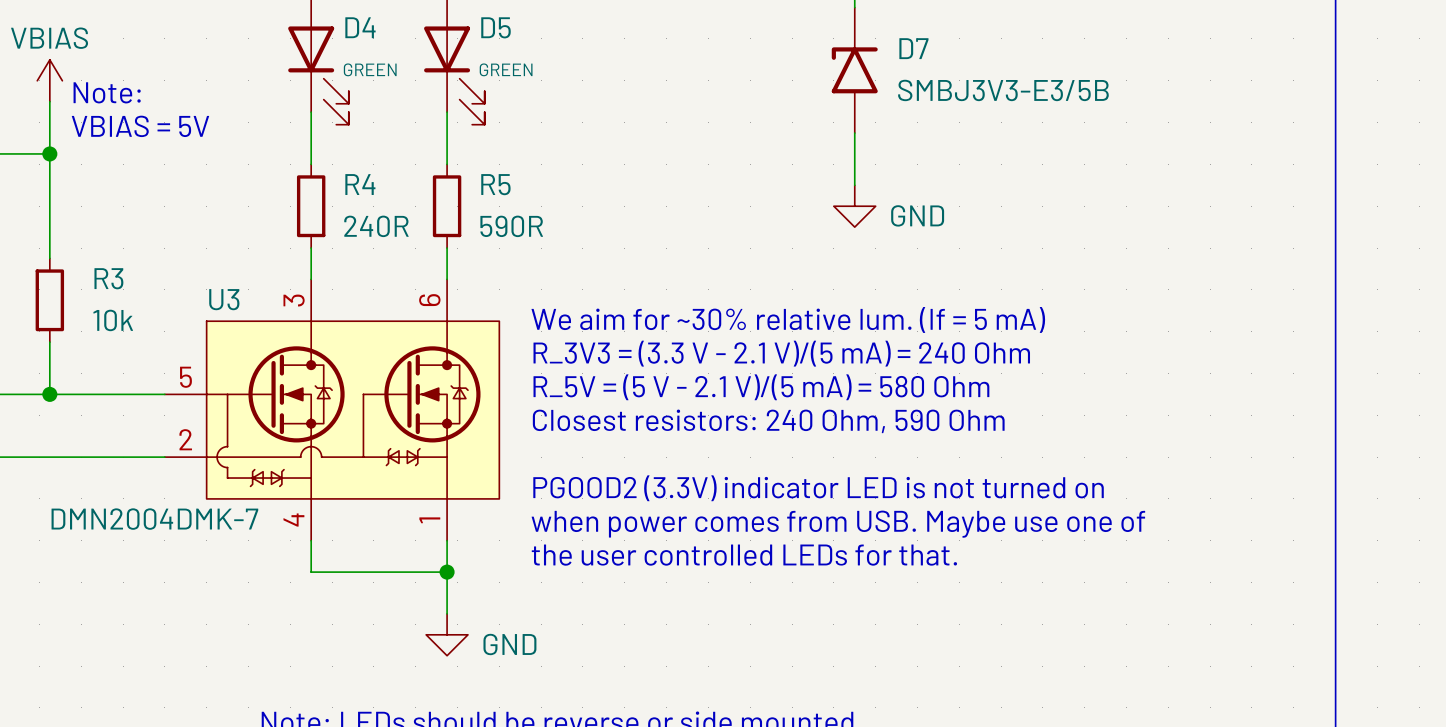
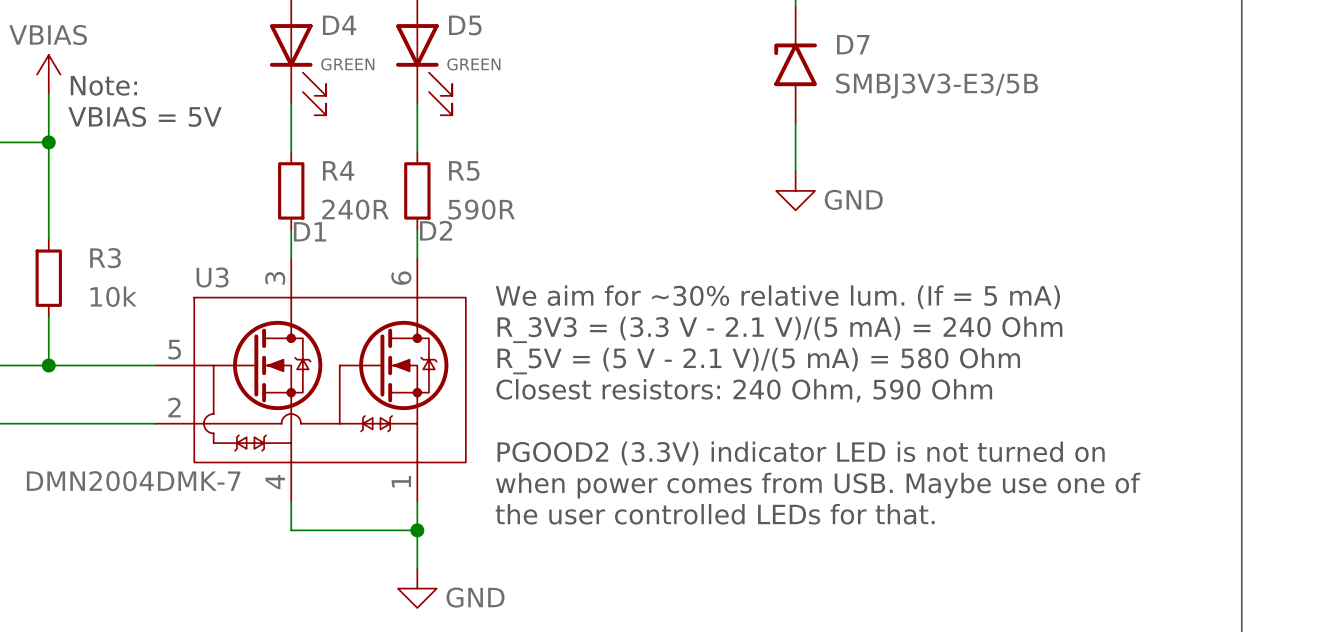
label: none -> D2 (436, 230)
label: none -> D1 (310, 231)

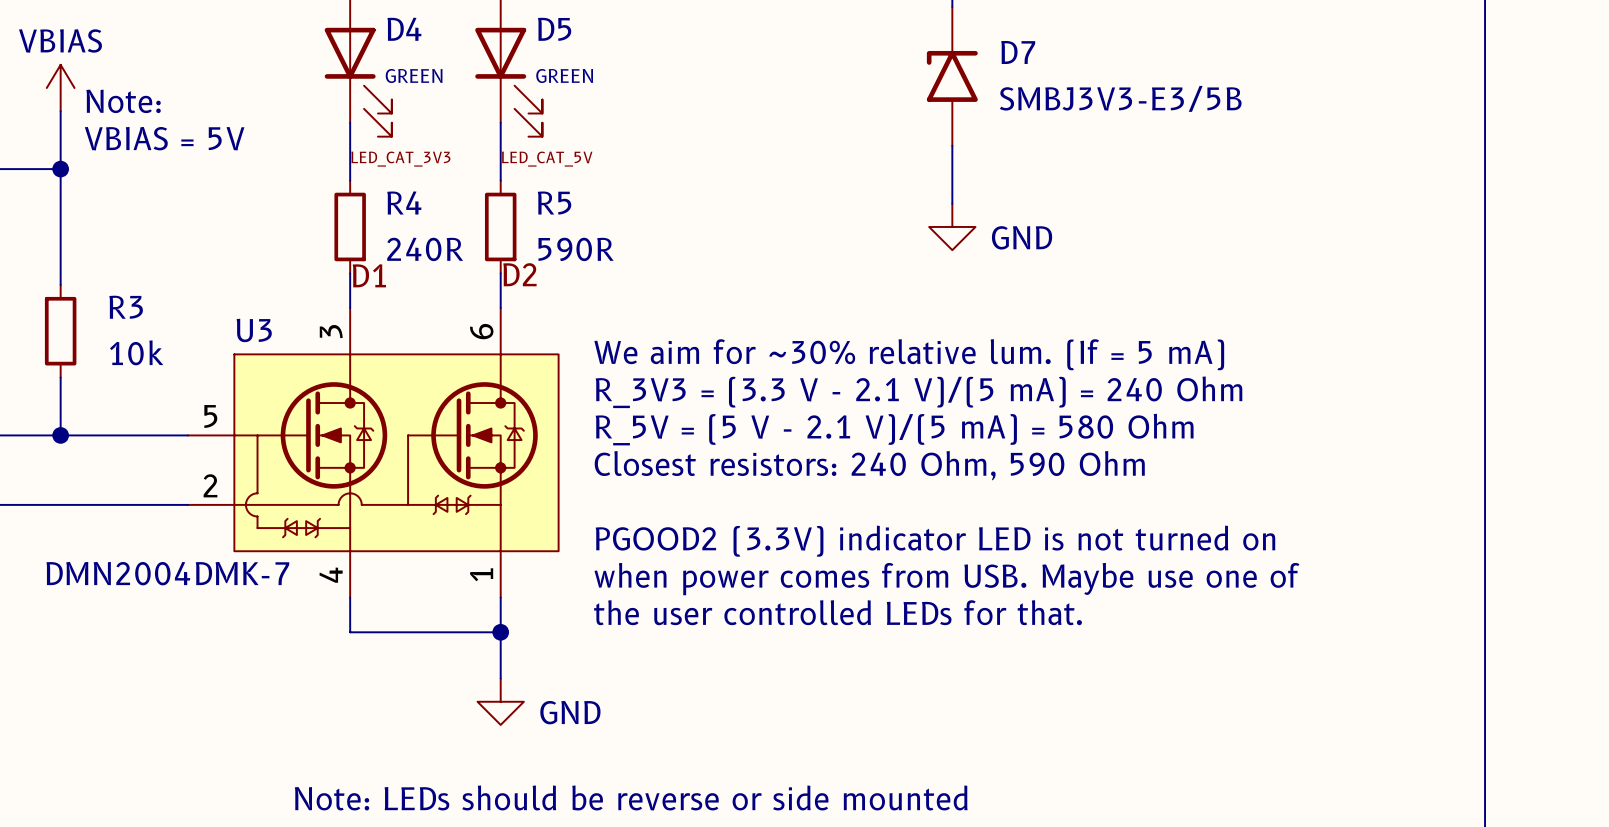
label: none -> LED_CAT_3V3 (400, 159)
label: none -> LED_CAT_5V (547, 159)

